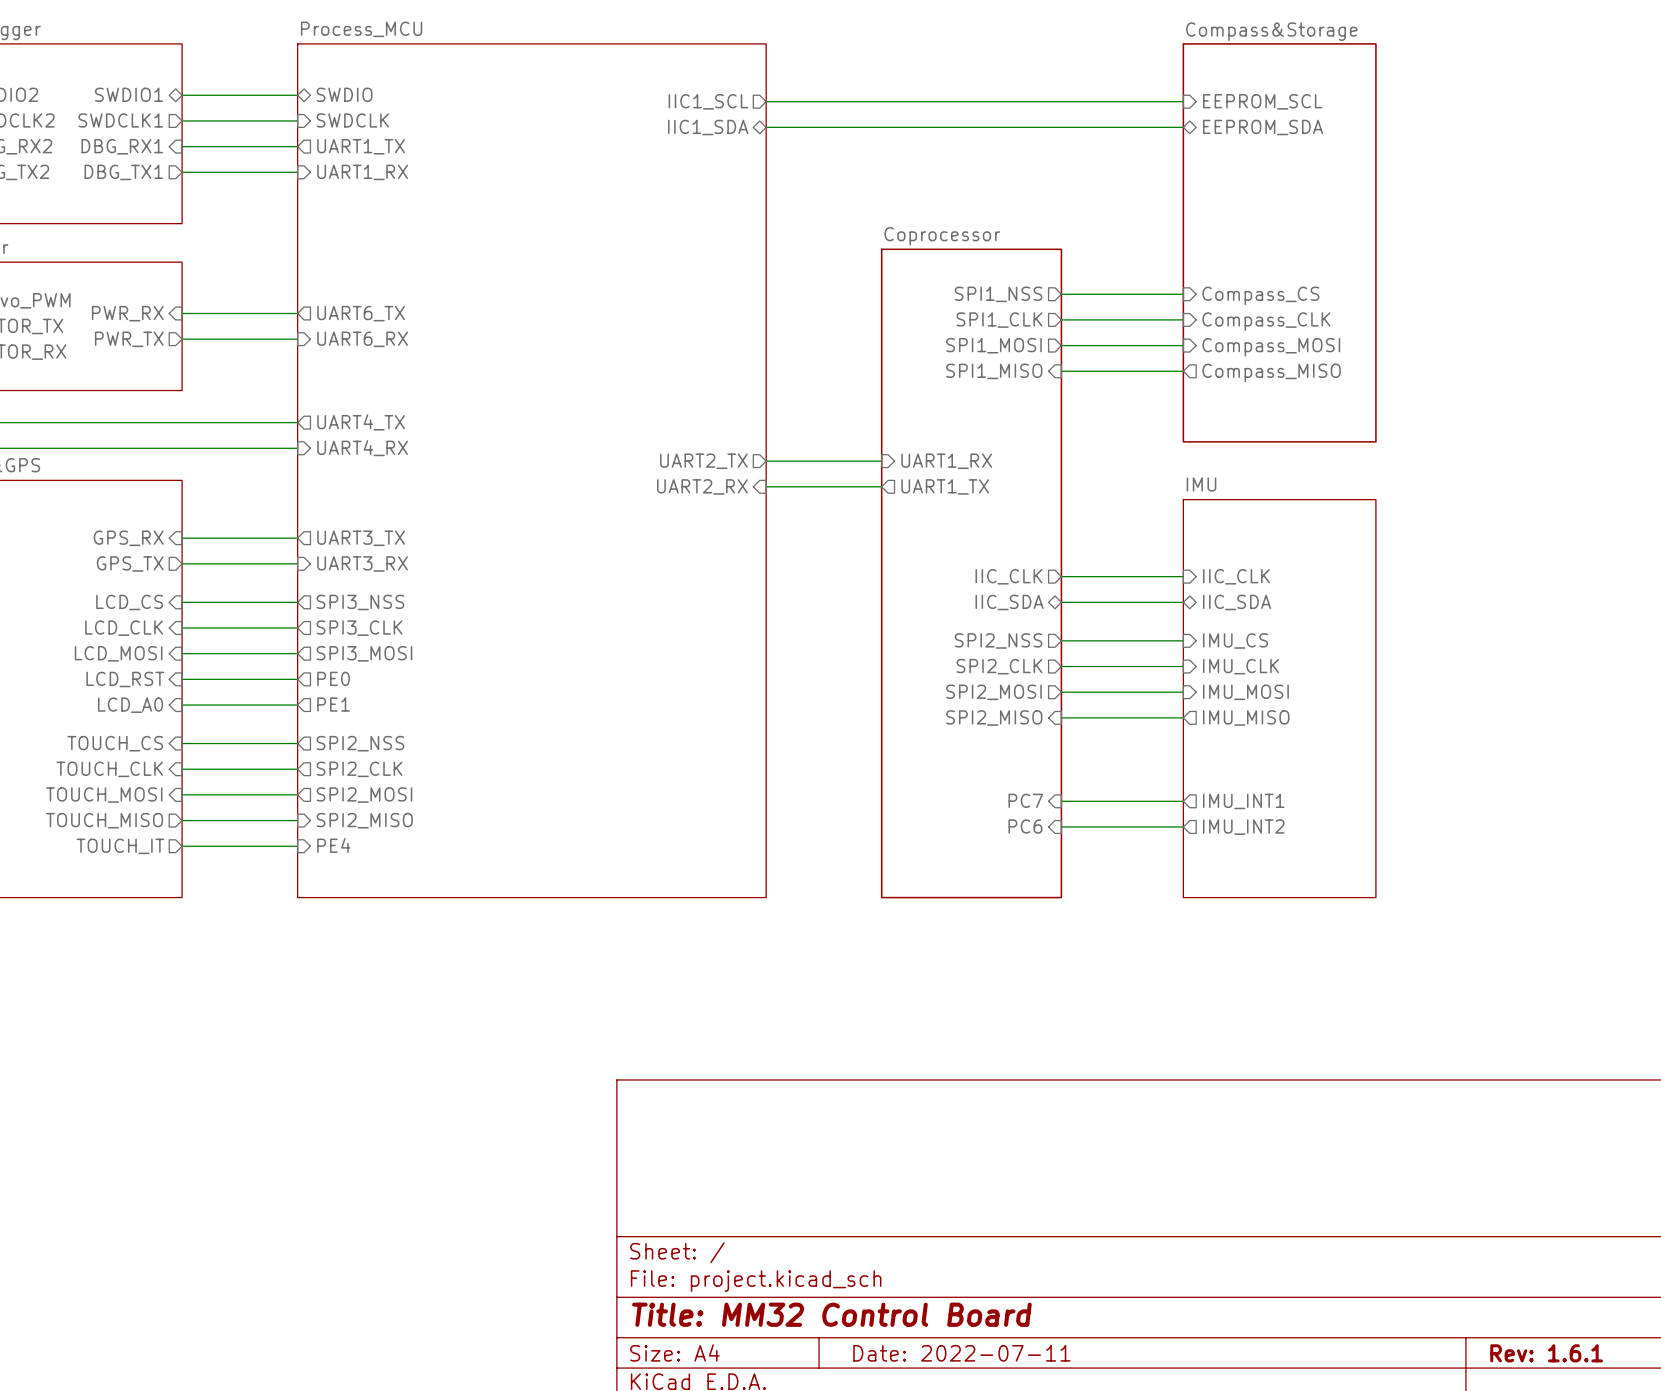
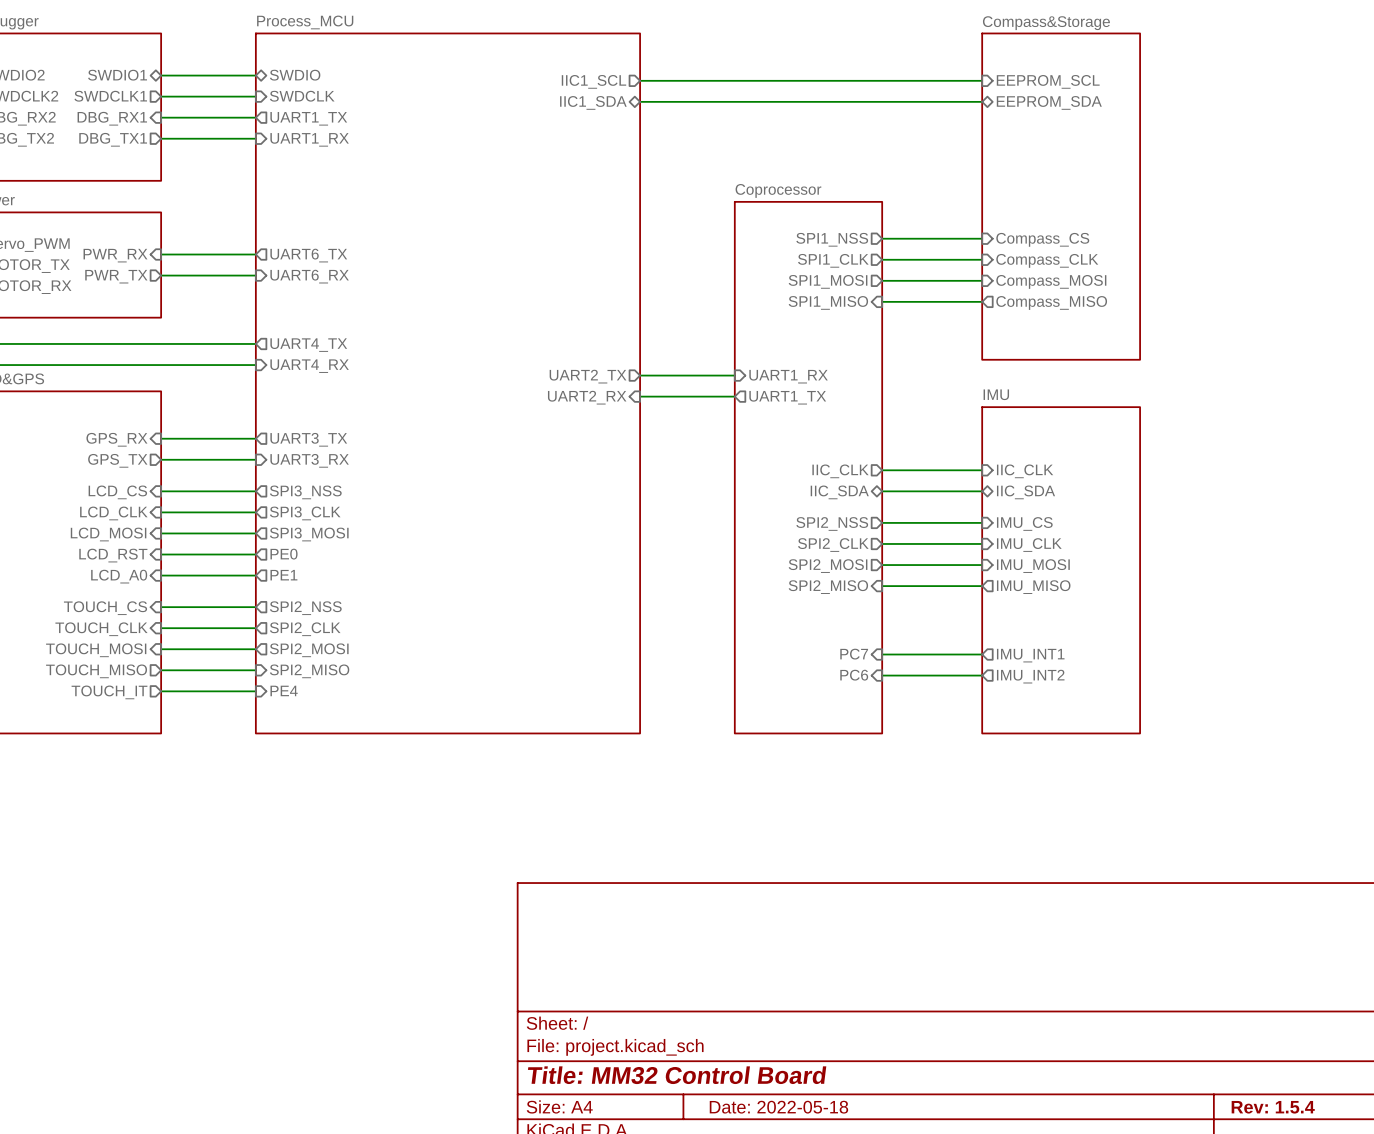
title block: Date: 2022-07-11 (961, 1353) -> Date: 2022-05-18 (778, 1107)
title block: Rev: 1.6.1 (1546, 1353) -> Rev: 1.5.4 (1273, 1107)

